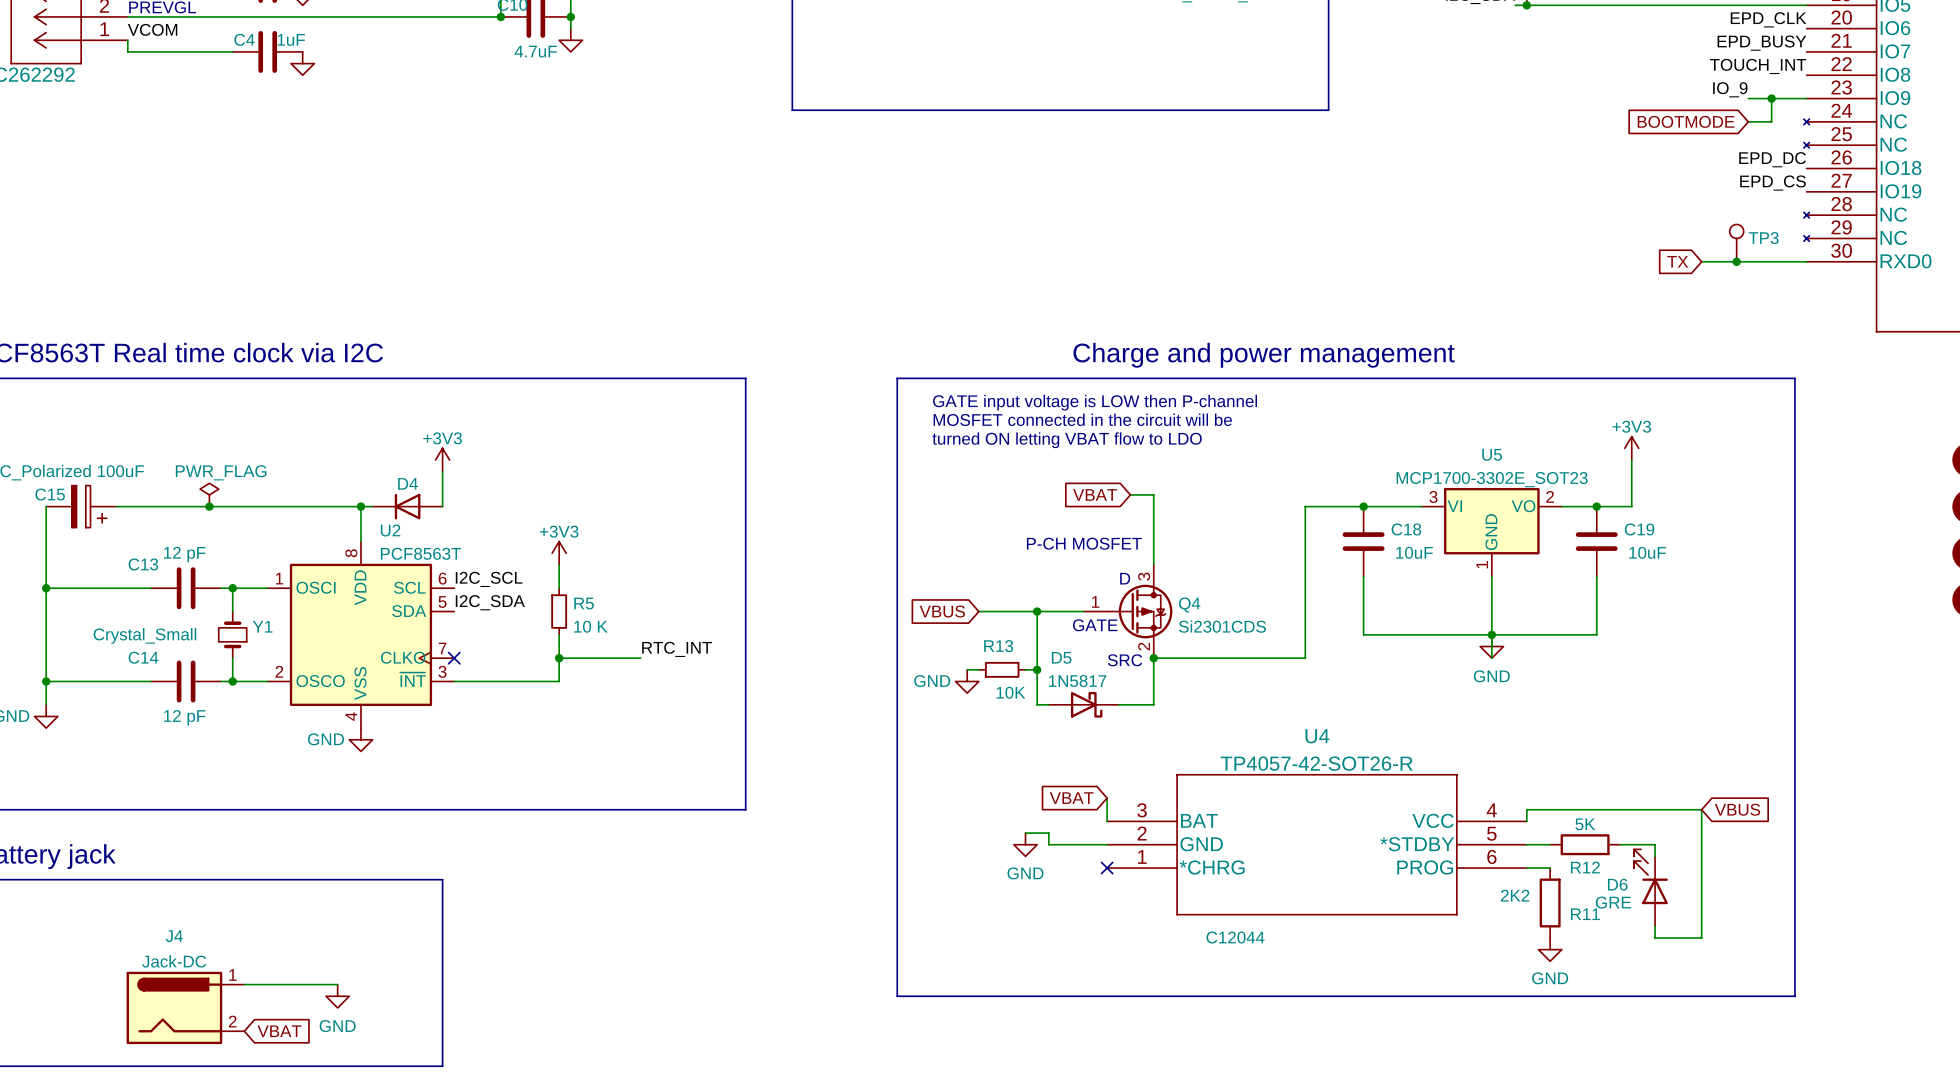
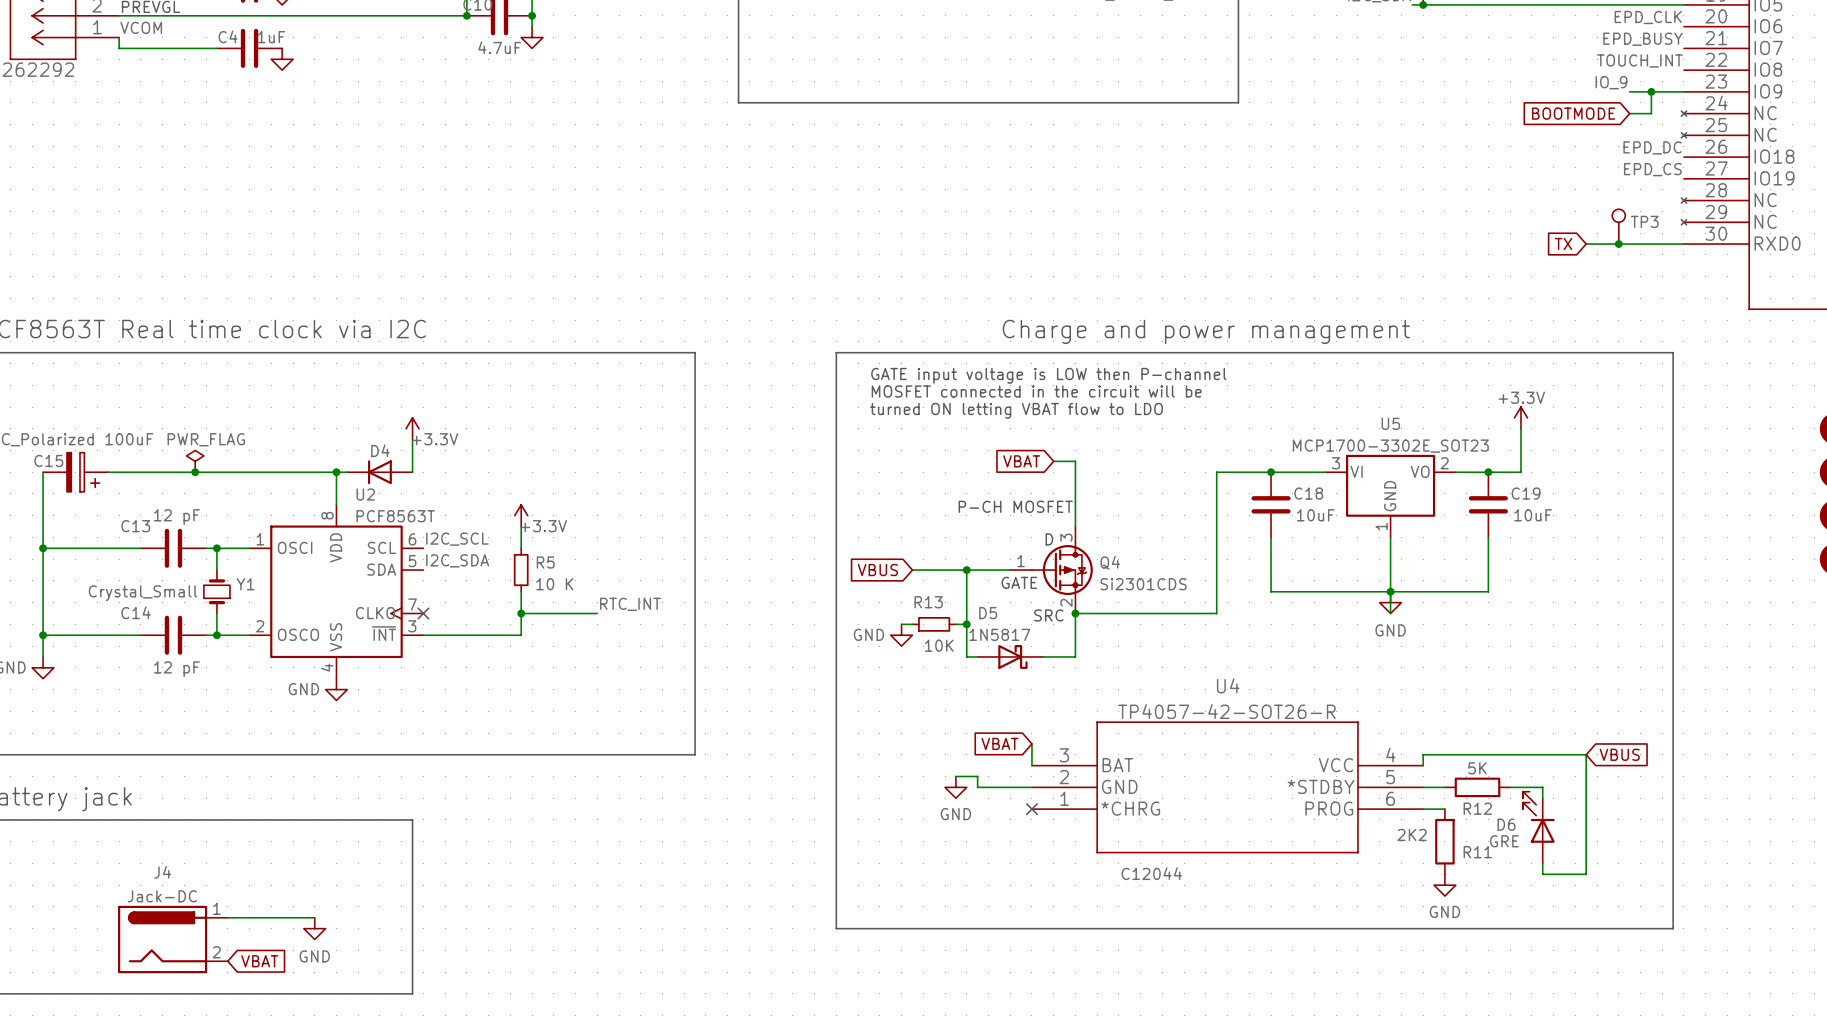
power symbol: +3V3 (1631, 448) -> +3.3V (1520, 417)
power symbol: +3V3 (442, 459) -> +3.3V (412, 428)
power symbol: +3V3 (559, 553) -> +3.3V (521, 515)

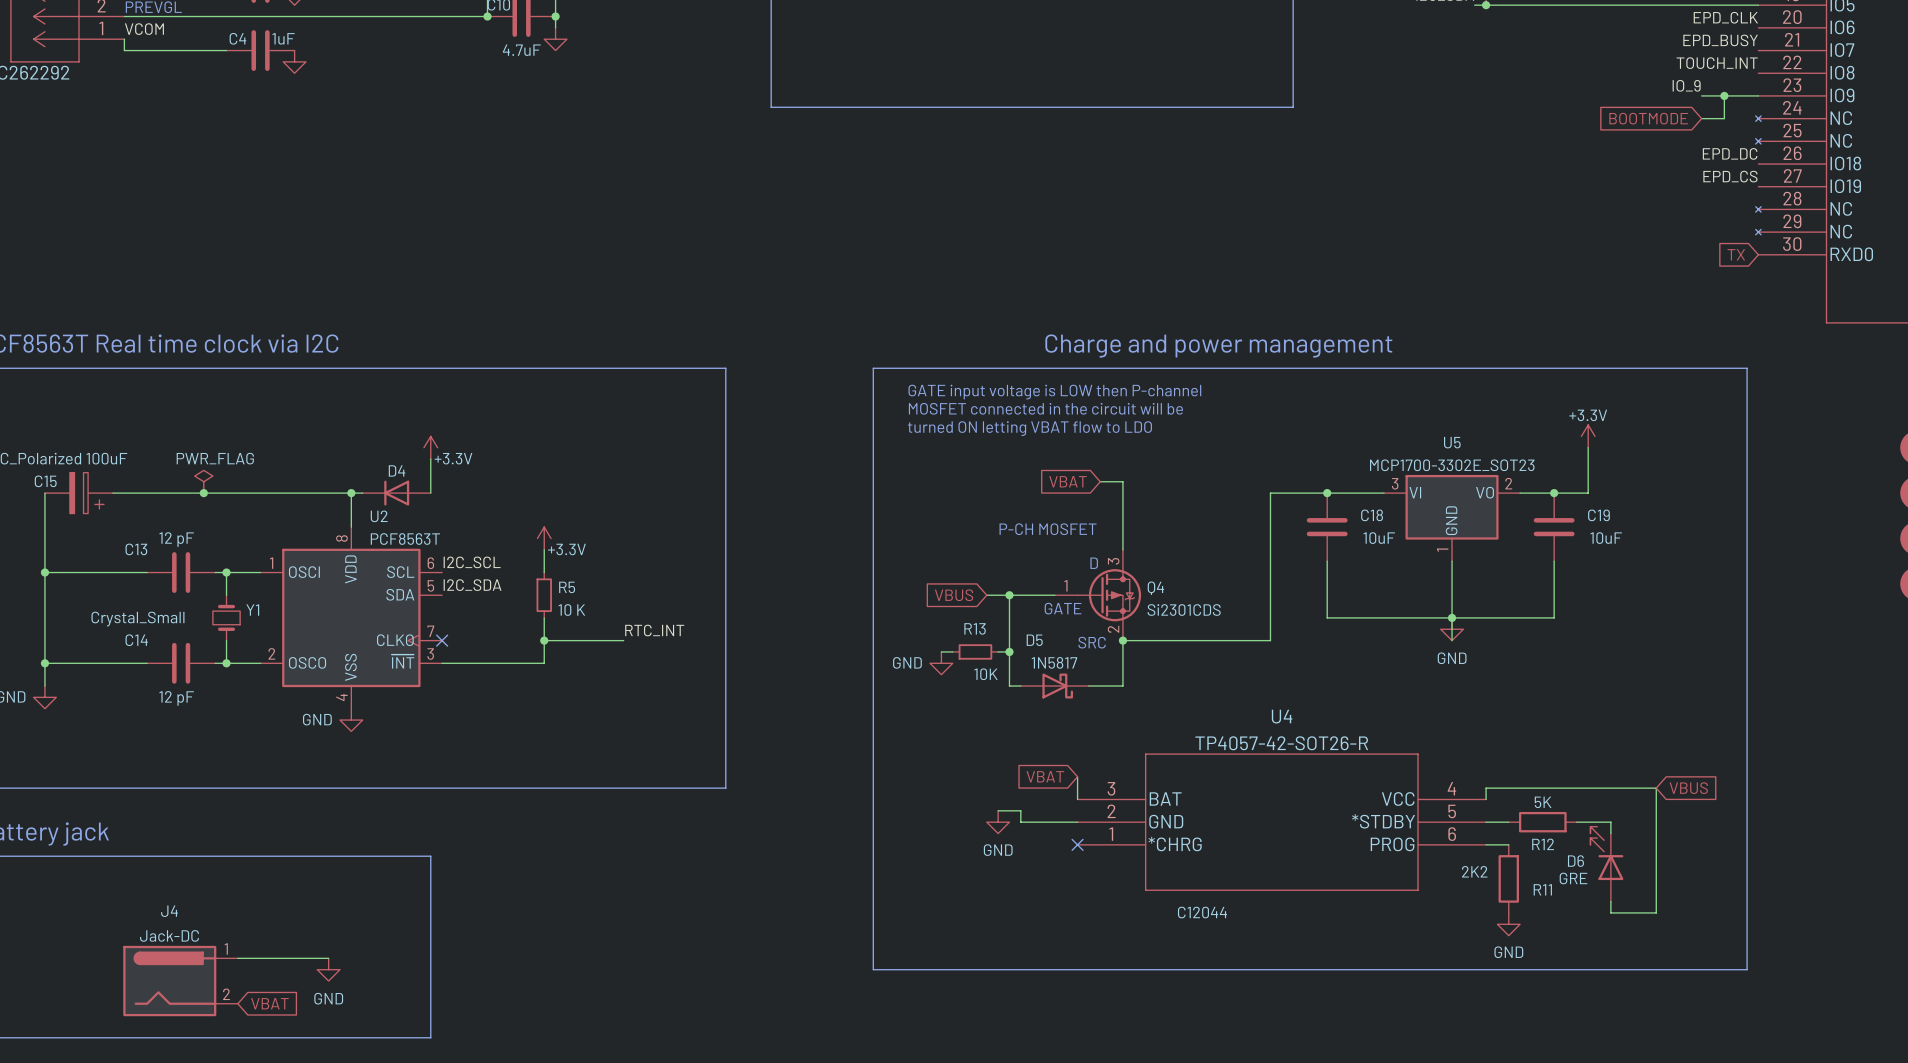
TP3: (1618, 226) -> none
global label position: TX (1563, 244) -> TX (1736, 254)
wire: (1586, 244) (1683, 244) -> none
junction: (1618, 244) -> none
global label position: VBUS (877, 570) -> VBUS (954, 595)
wire: (912, 570) (945, 570) -> none

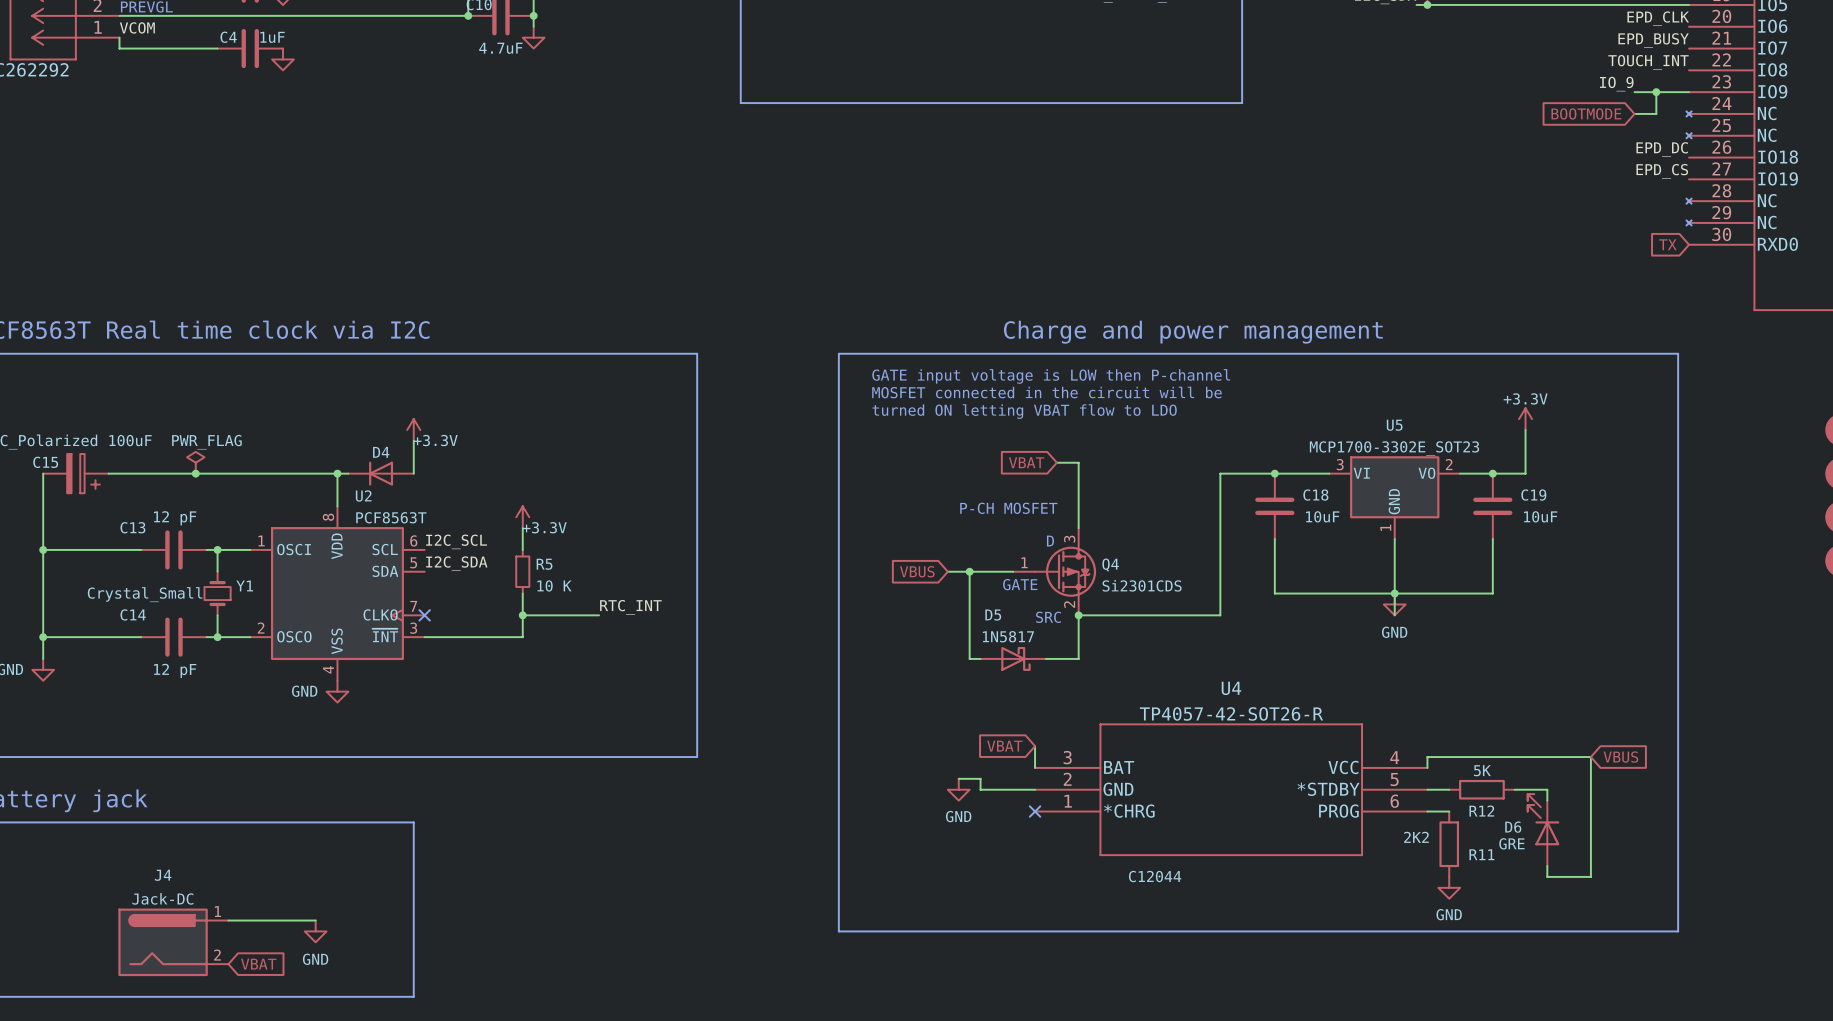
wire: (941, 651) (952, 651) -> none
R13: 10K (975, 651) -> none
wire: (998, 651) (1009, 651) -> none
junction: (1009, 651) -> none
power symbol: GND (941, 663) -> none

